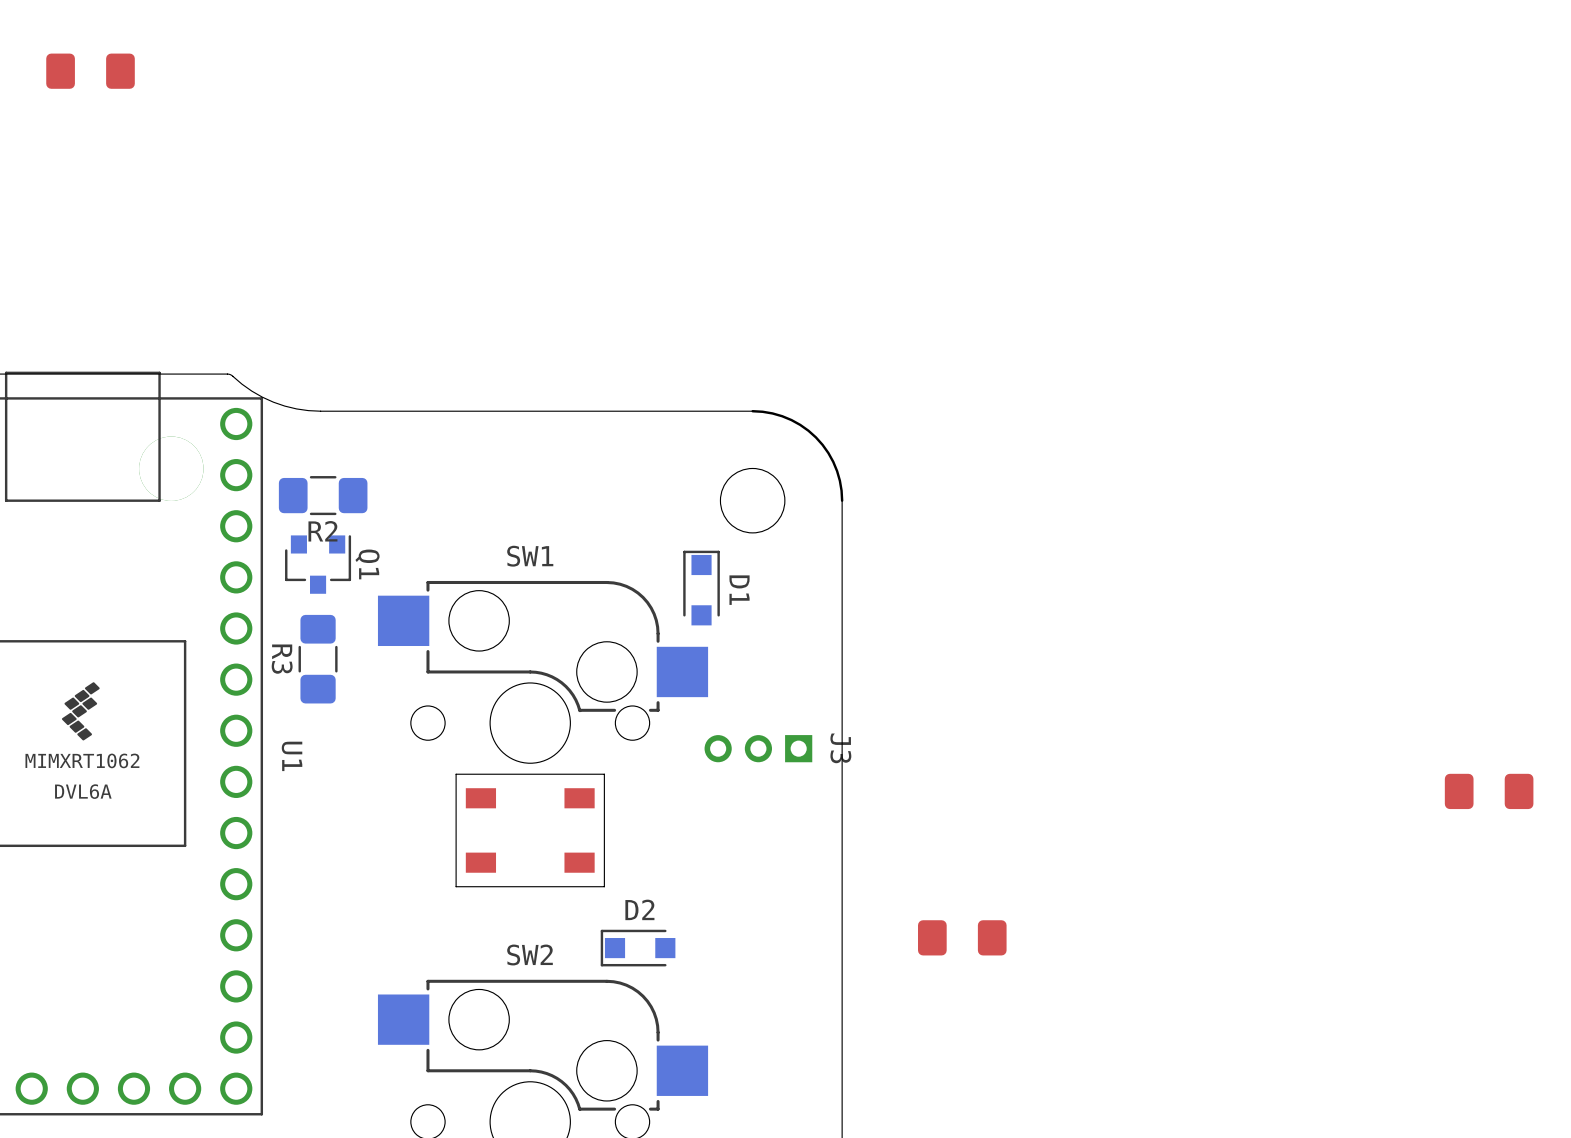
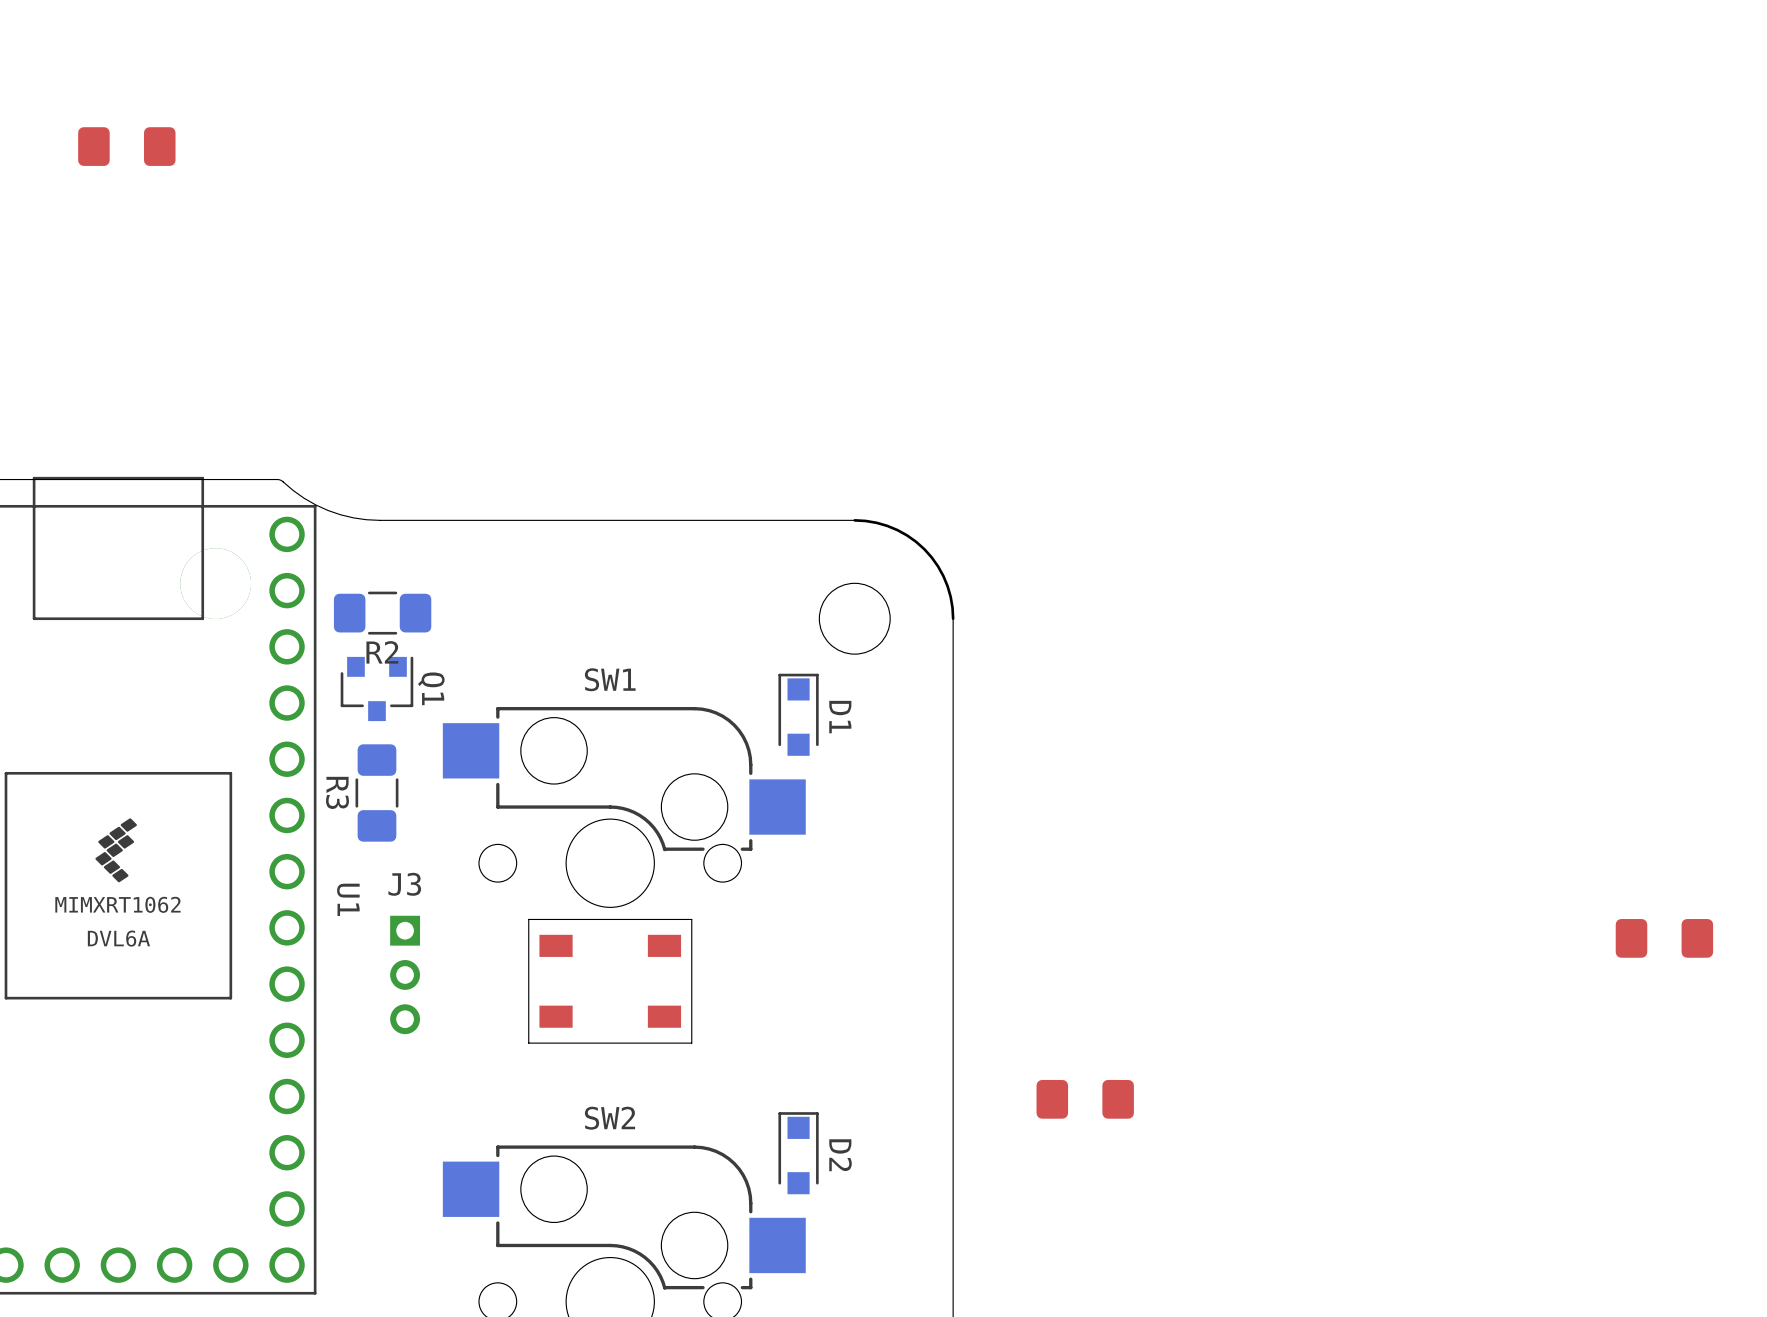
J3 rotation: 0° (758, 748) -> 90° counterclockwise (405, 974)
J3 position: (758, 748) -> (405, 974)
D2 rotation: 0° (638, 948) -> 90° clockwise (798, 1153)
D2 position: (638, 948) -> (798, 1153)

